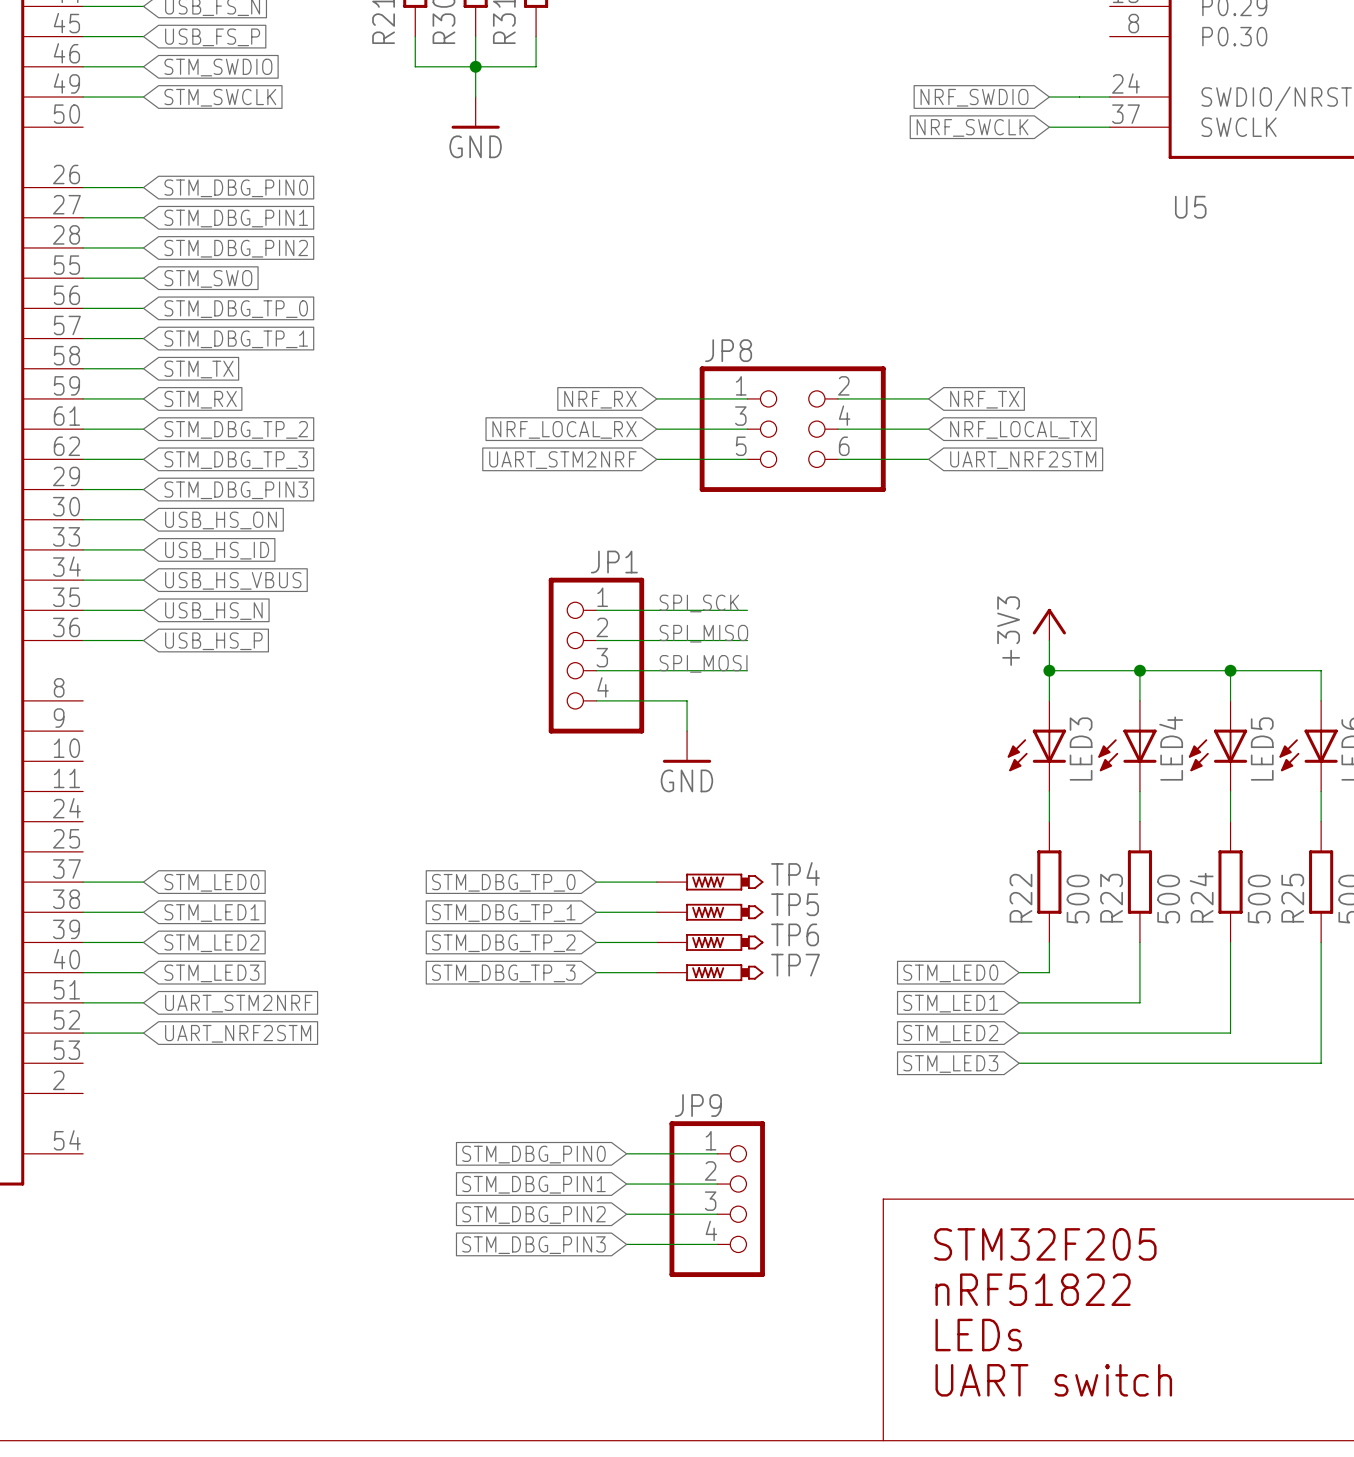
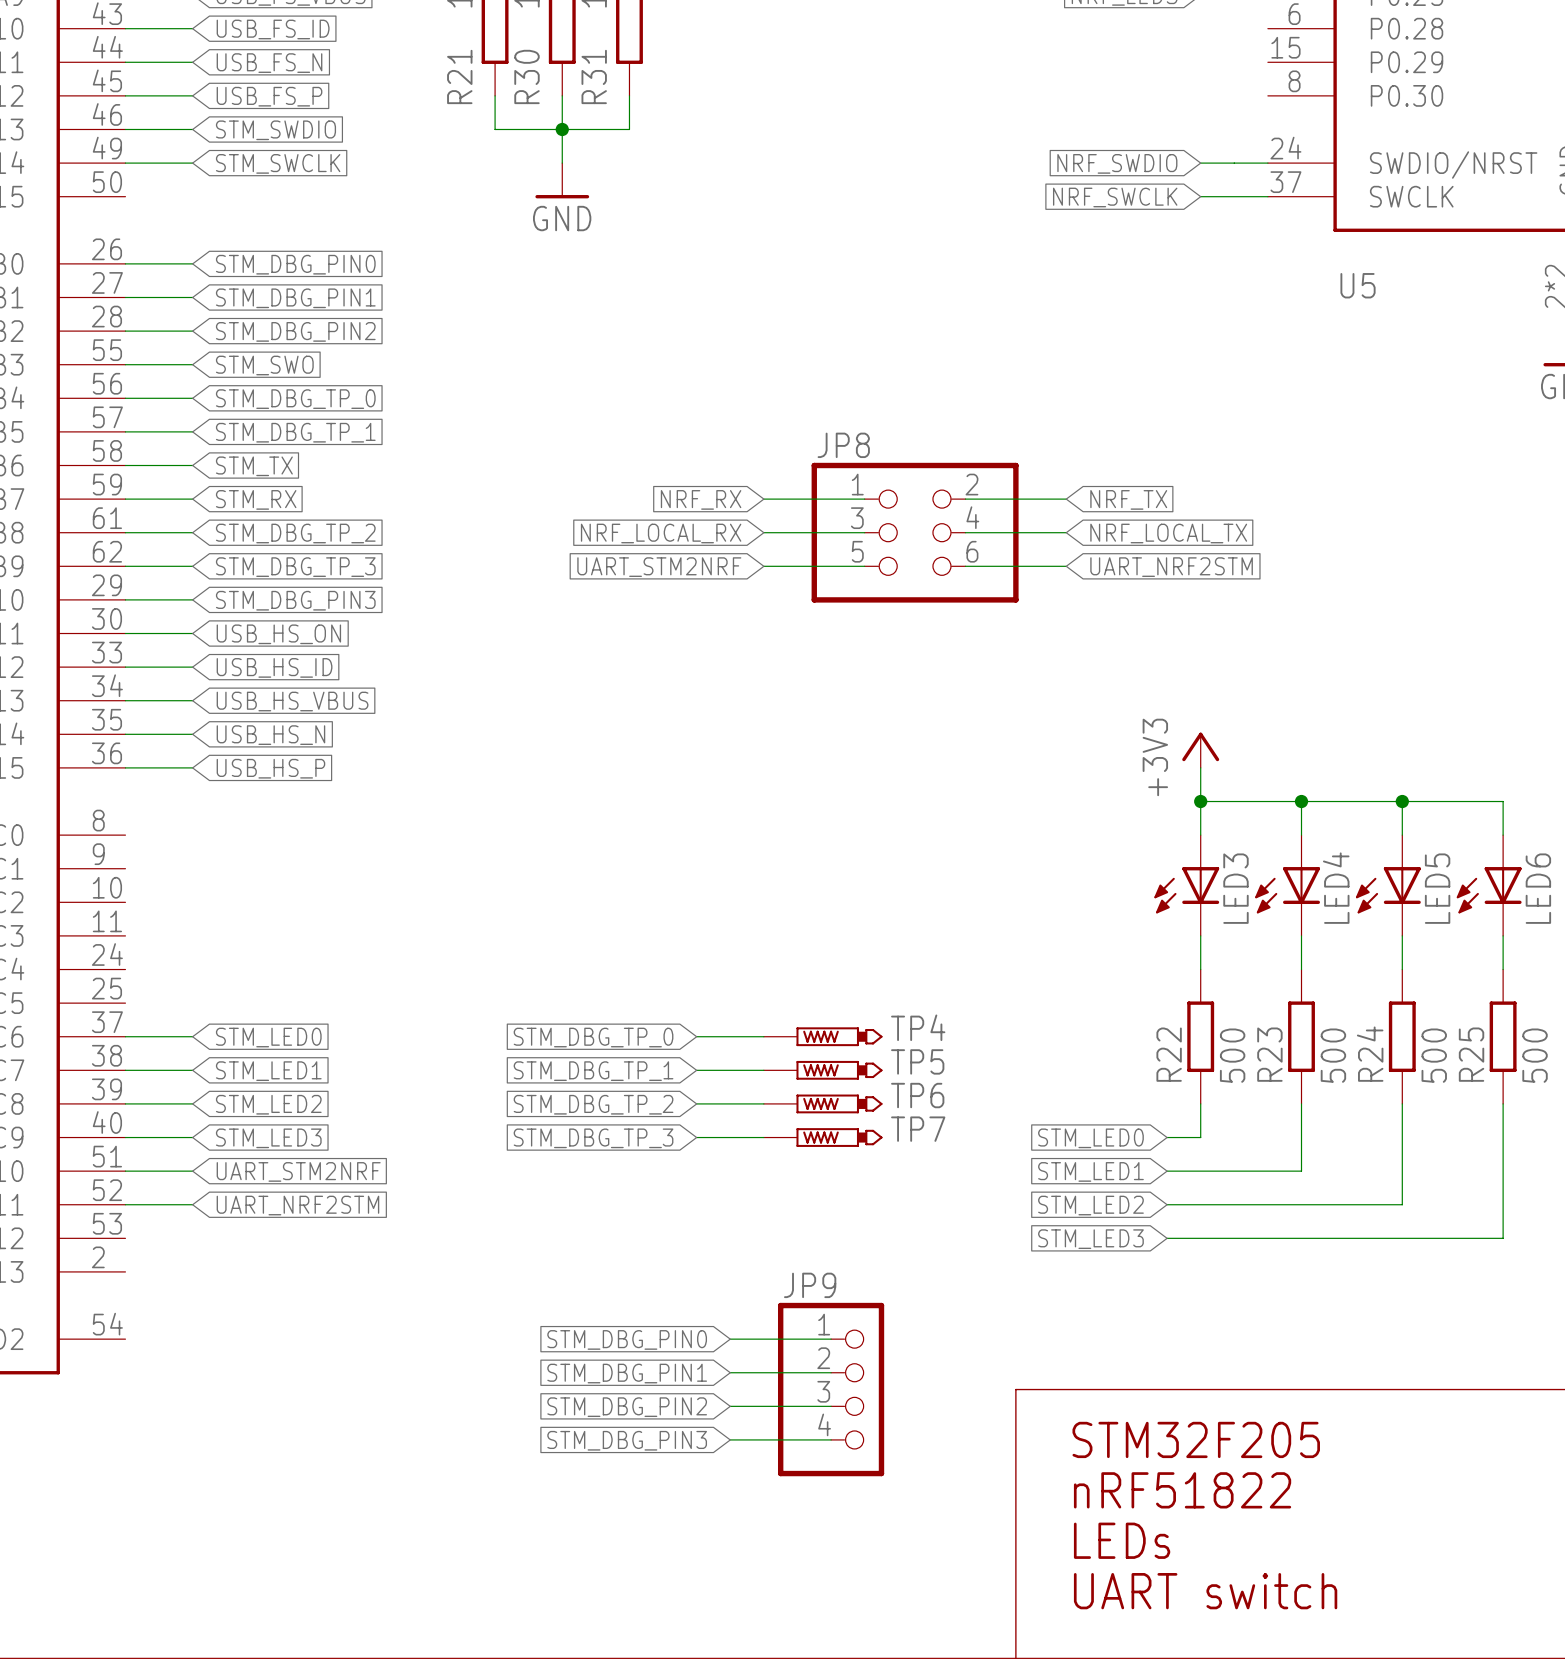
label: SPI_SCK (699, 603) -> none
wire: (596, 610) (747, 610) -> none
label: SPI_MISO (703, 633) -> none
wire: (596, 640) (747, 640) -> none
JP1: (596, 655) -> none
label: SPI_MOSI (703, 663) -> none
wire: (596, 670) (747, 670) -> none
wire: (596, 700) (687, 700) (687, 731) -> none
power symbol: GND (687, 746) -> none

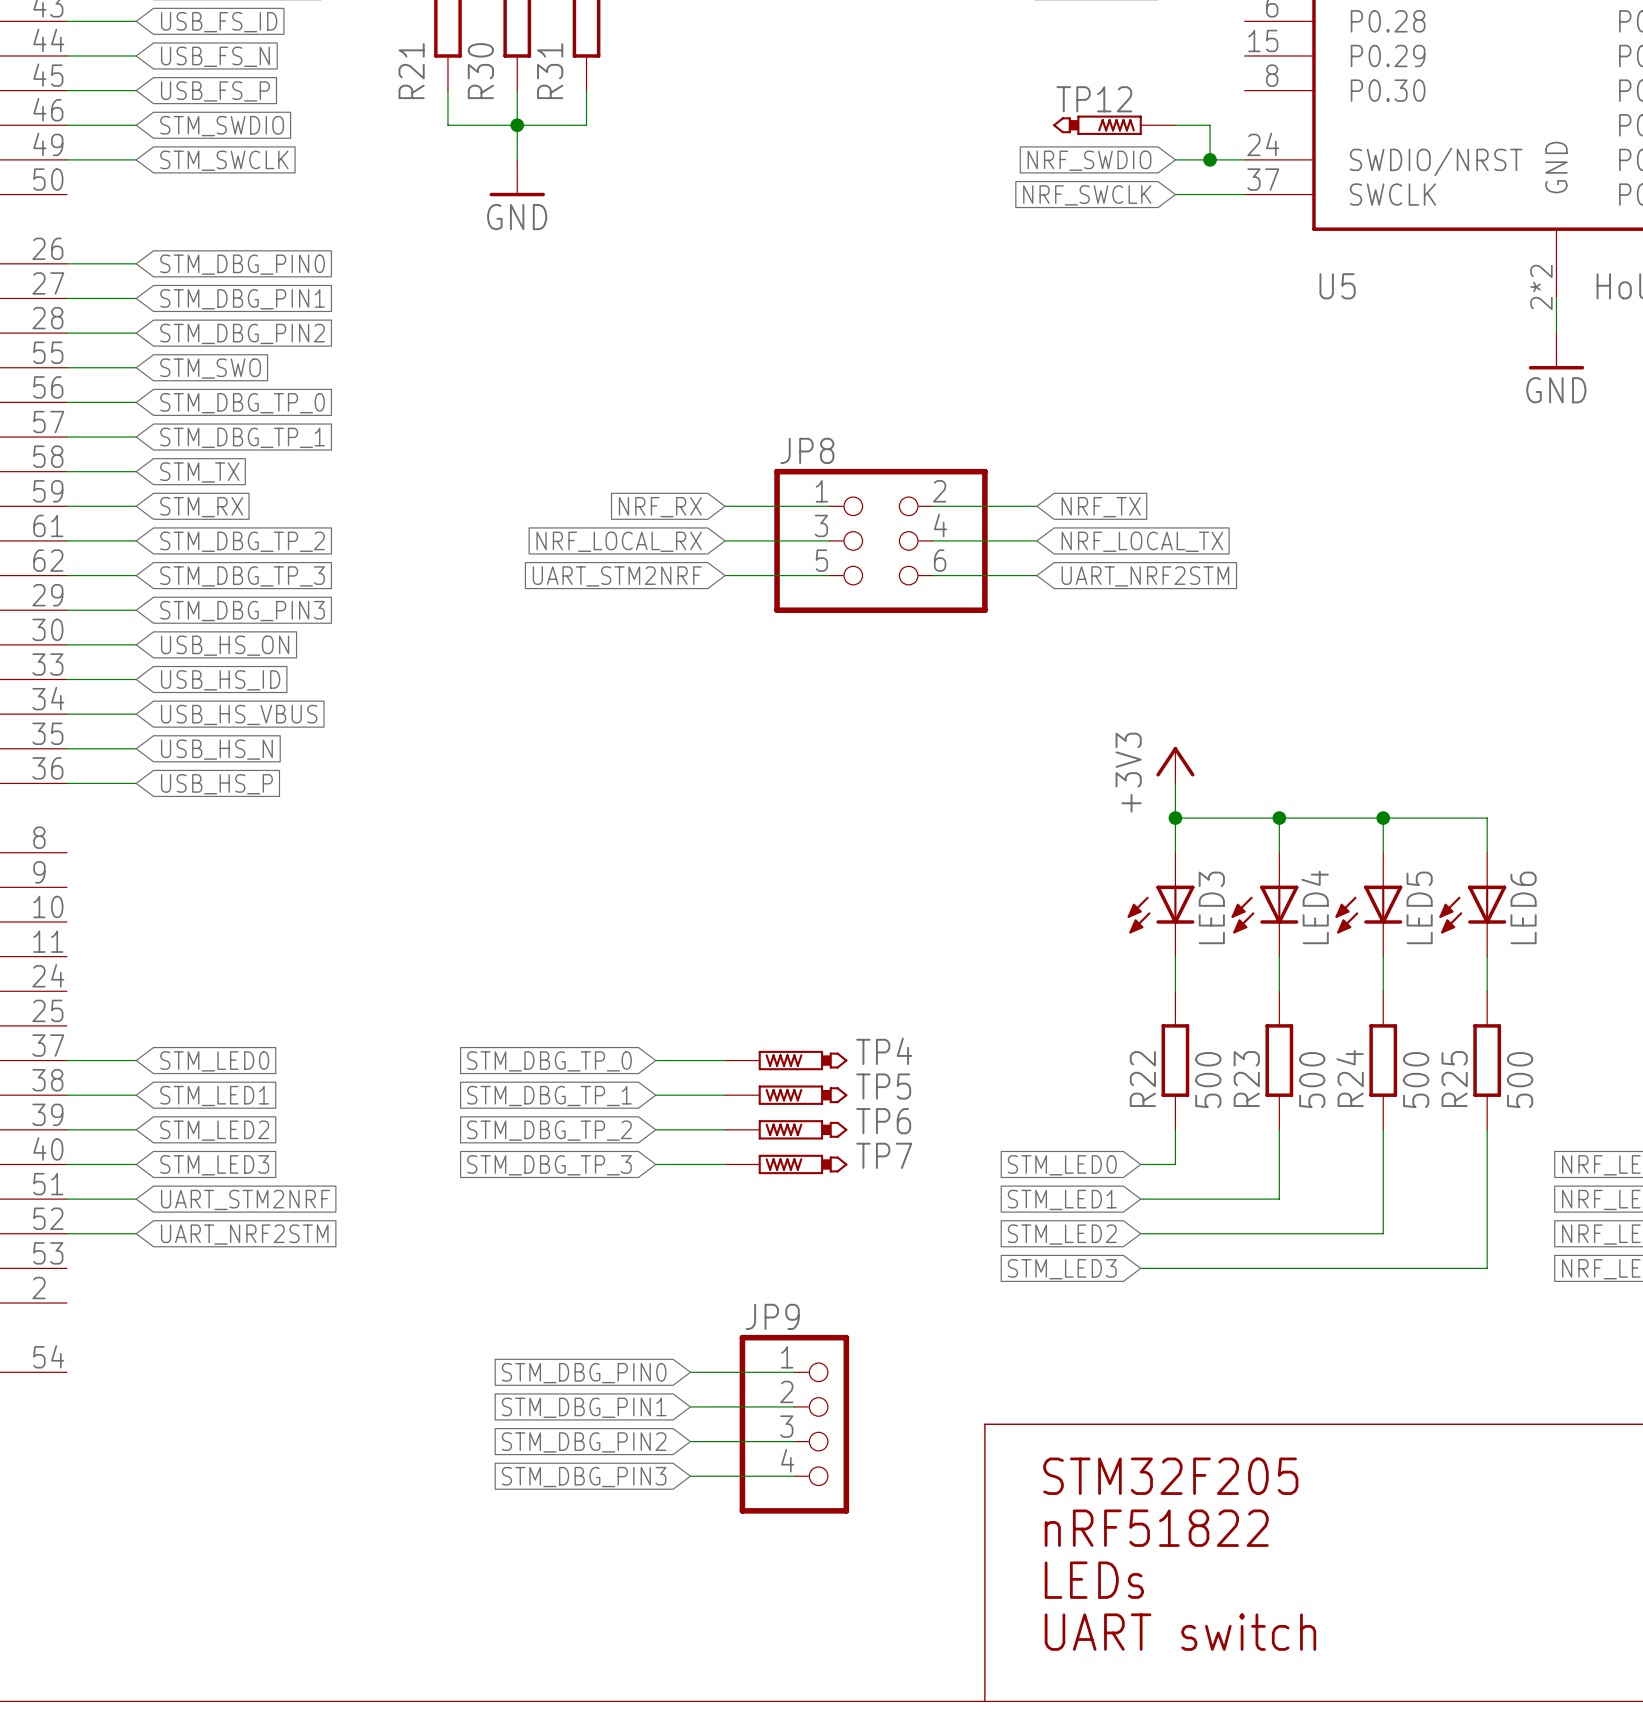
TP12: none -> (1114, 125)
wire: none -> (1175, 125) (1210, 125) (1210, 159)
junction: none -> (1210, 159)

